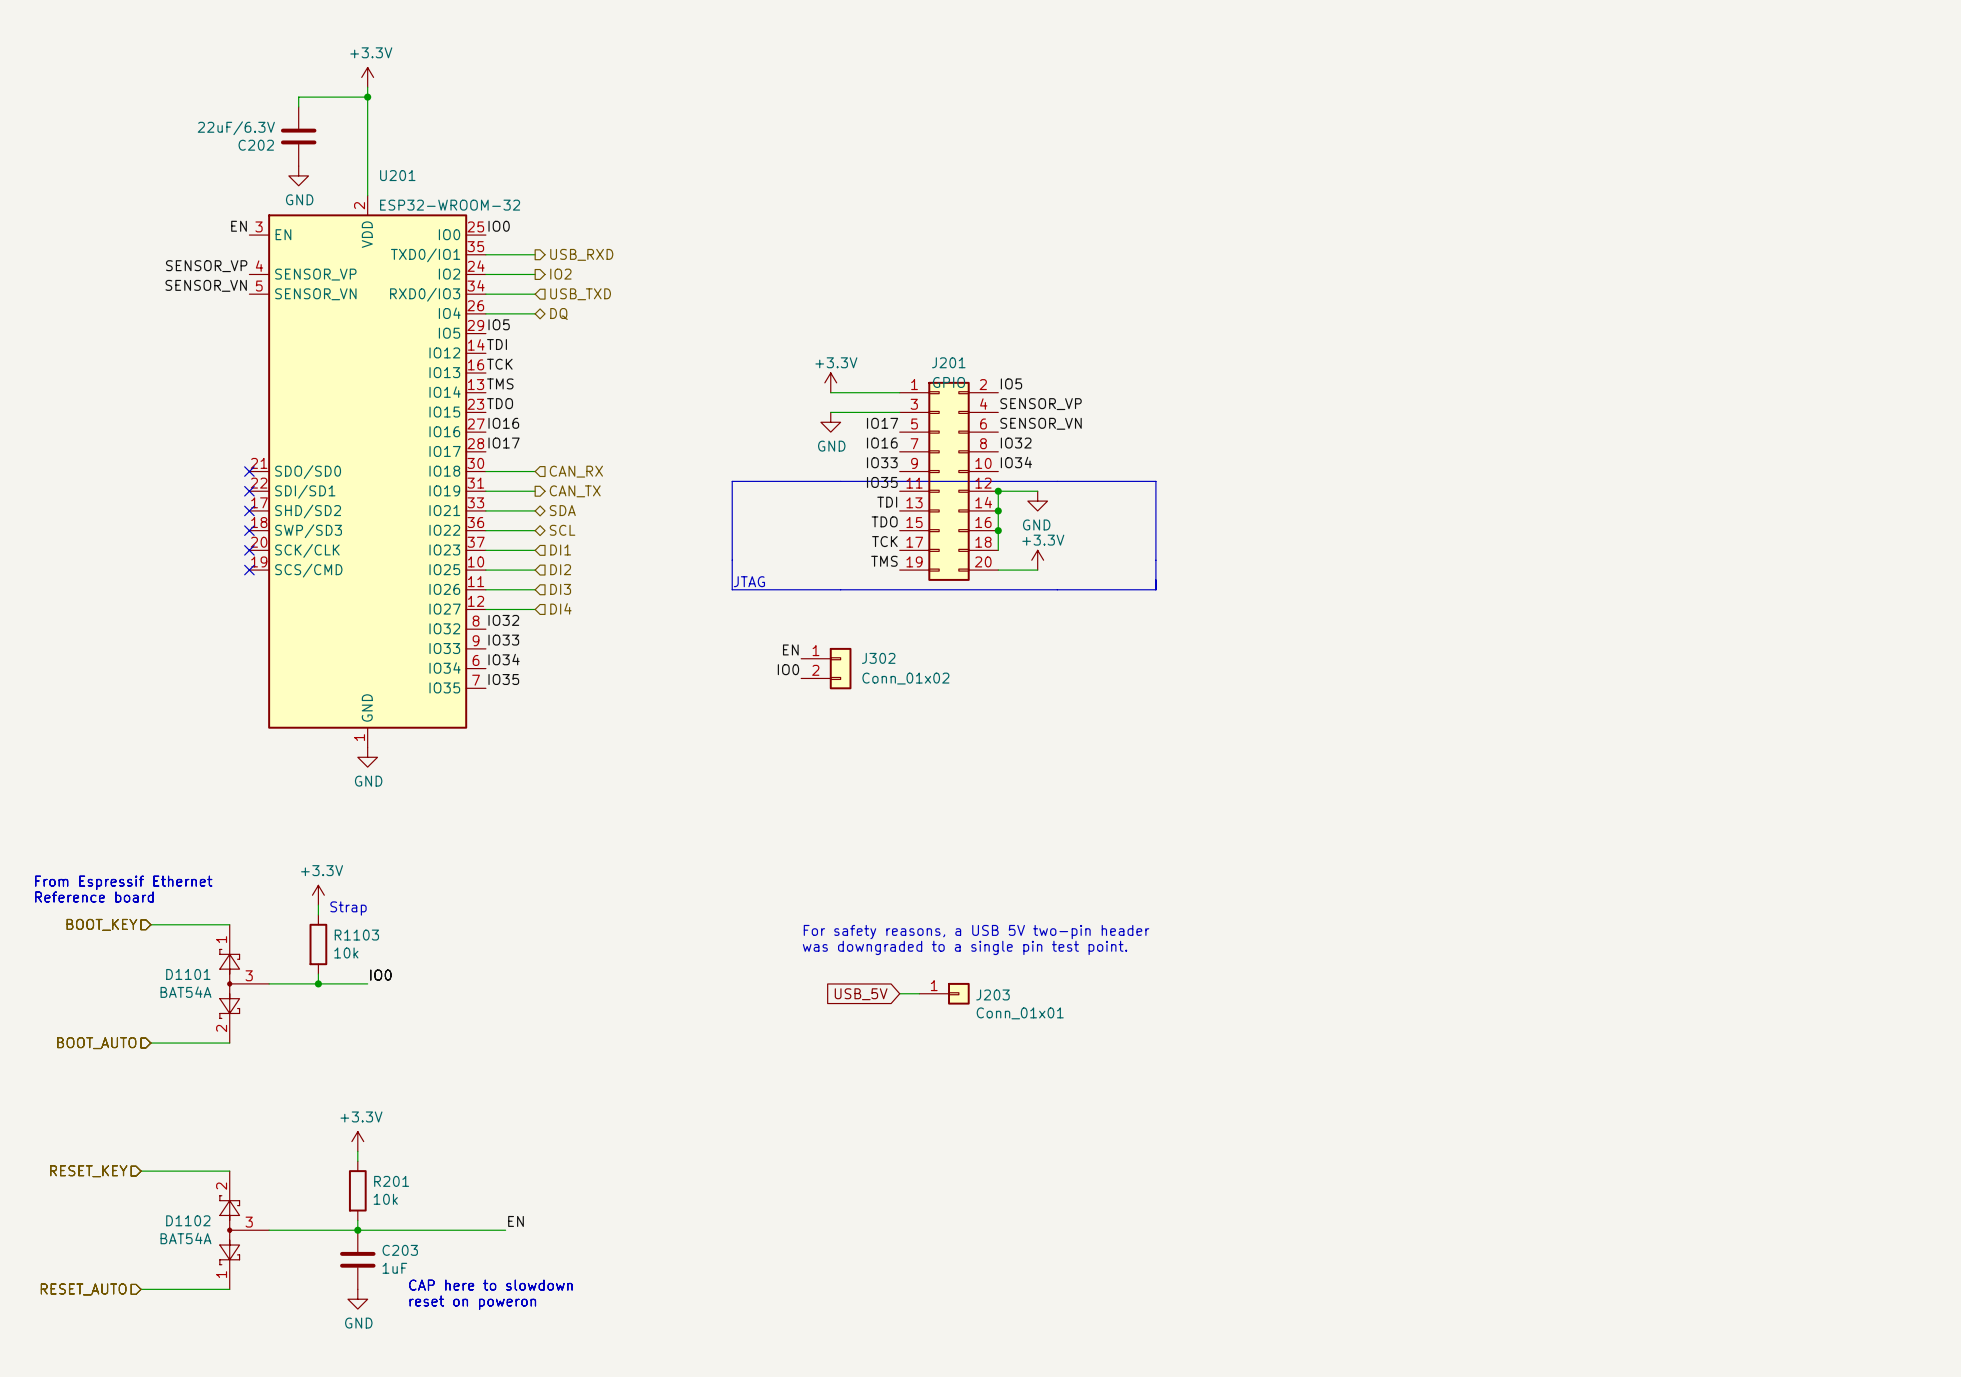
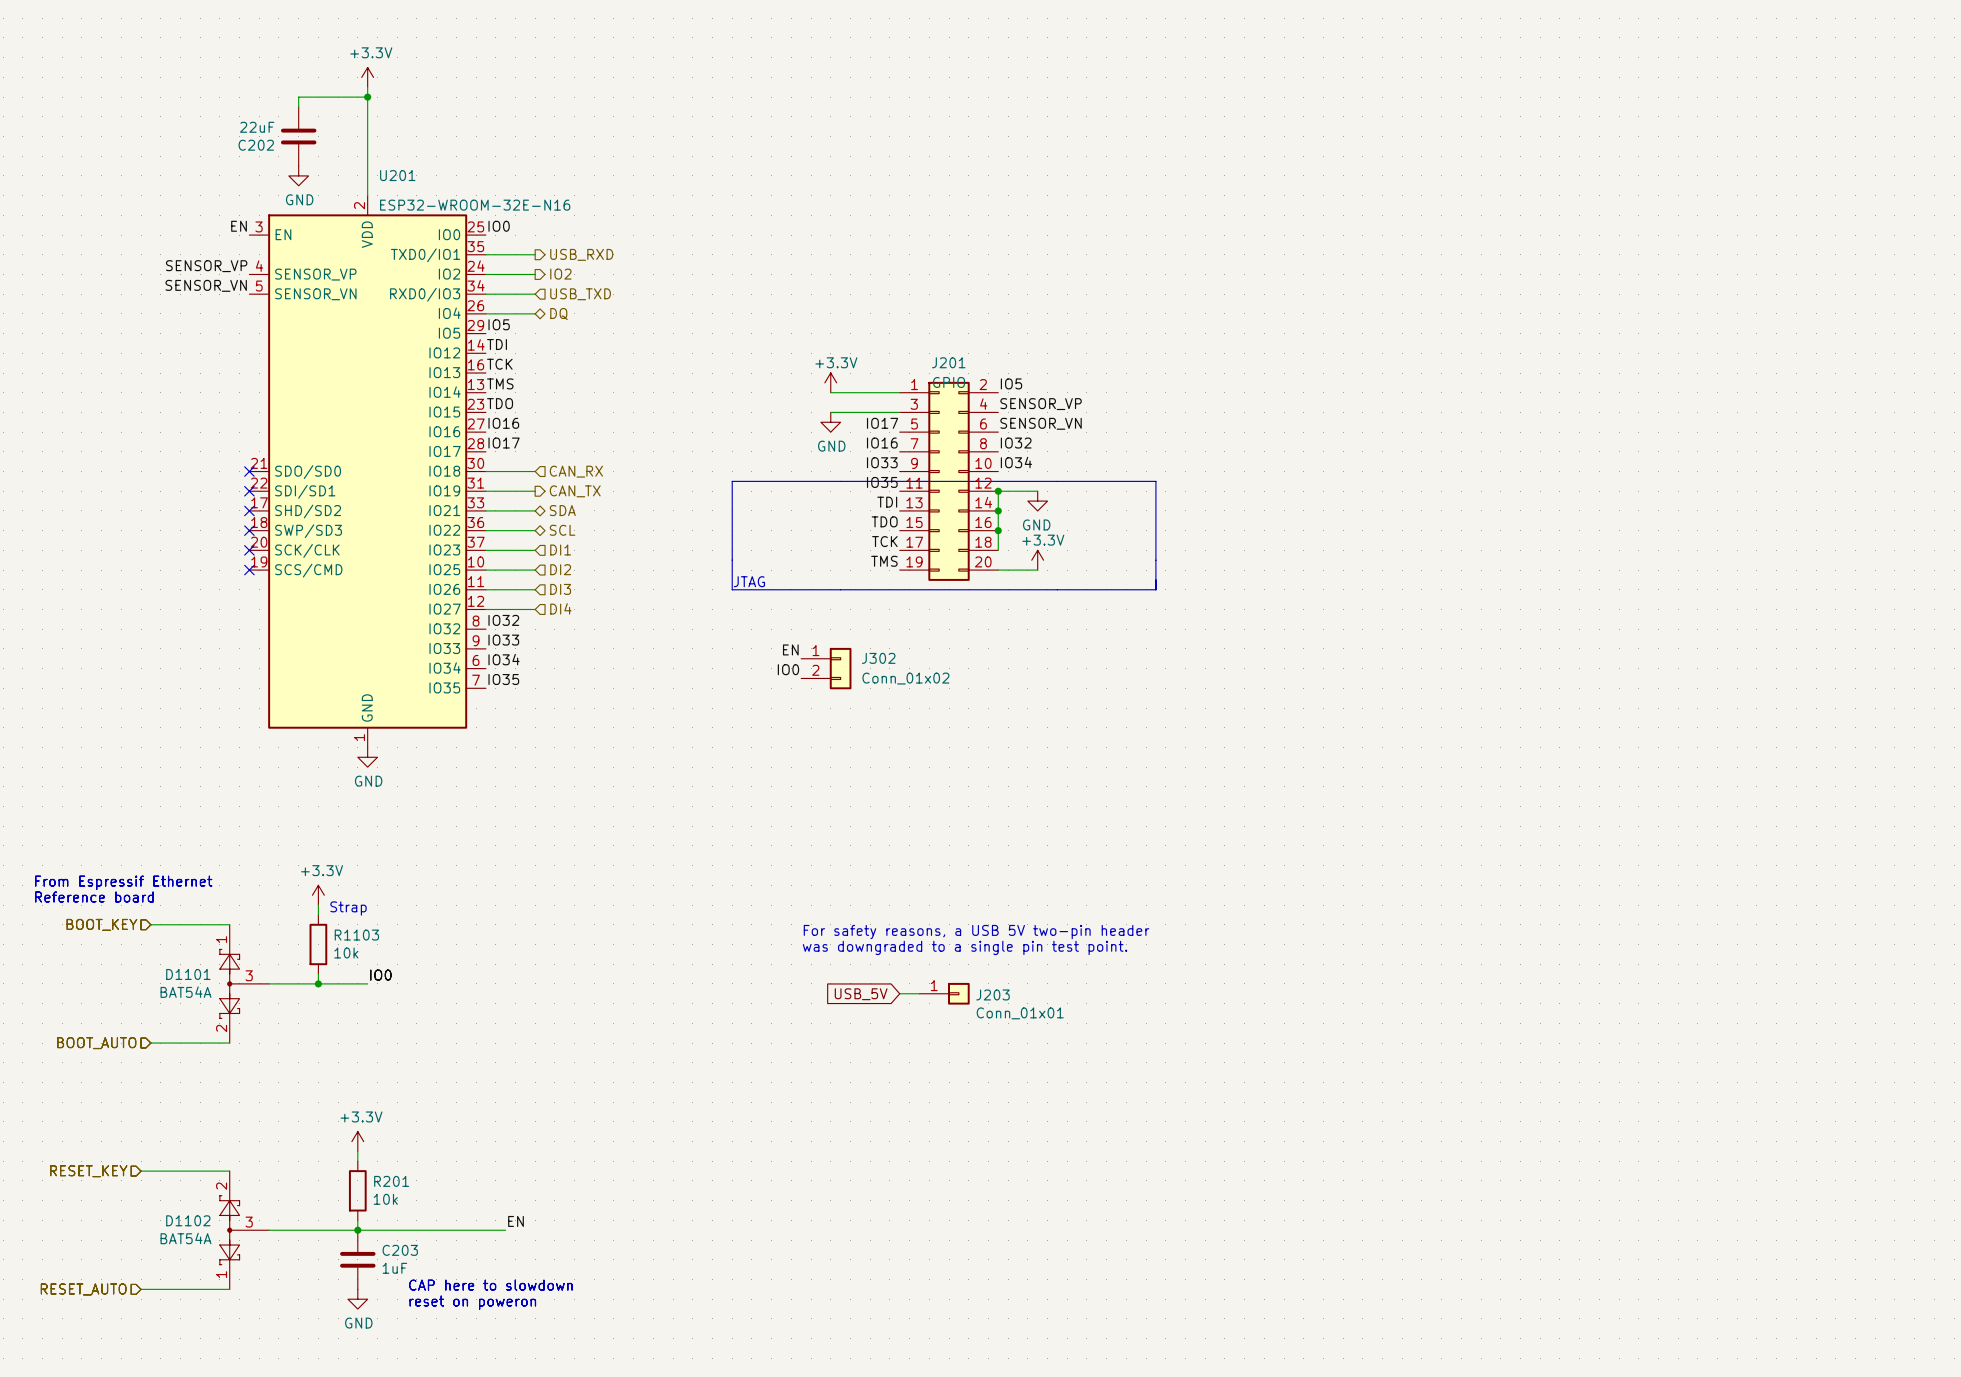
C202 value: 22uF/6.3V (236, 128) -> 22uF (257, 127)
U201 value: ESP32-WROOM-32 (450, 205) -> ESP32-WROOM-32E-N16 (475, 205)

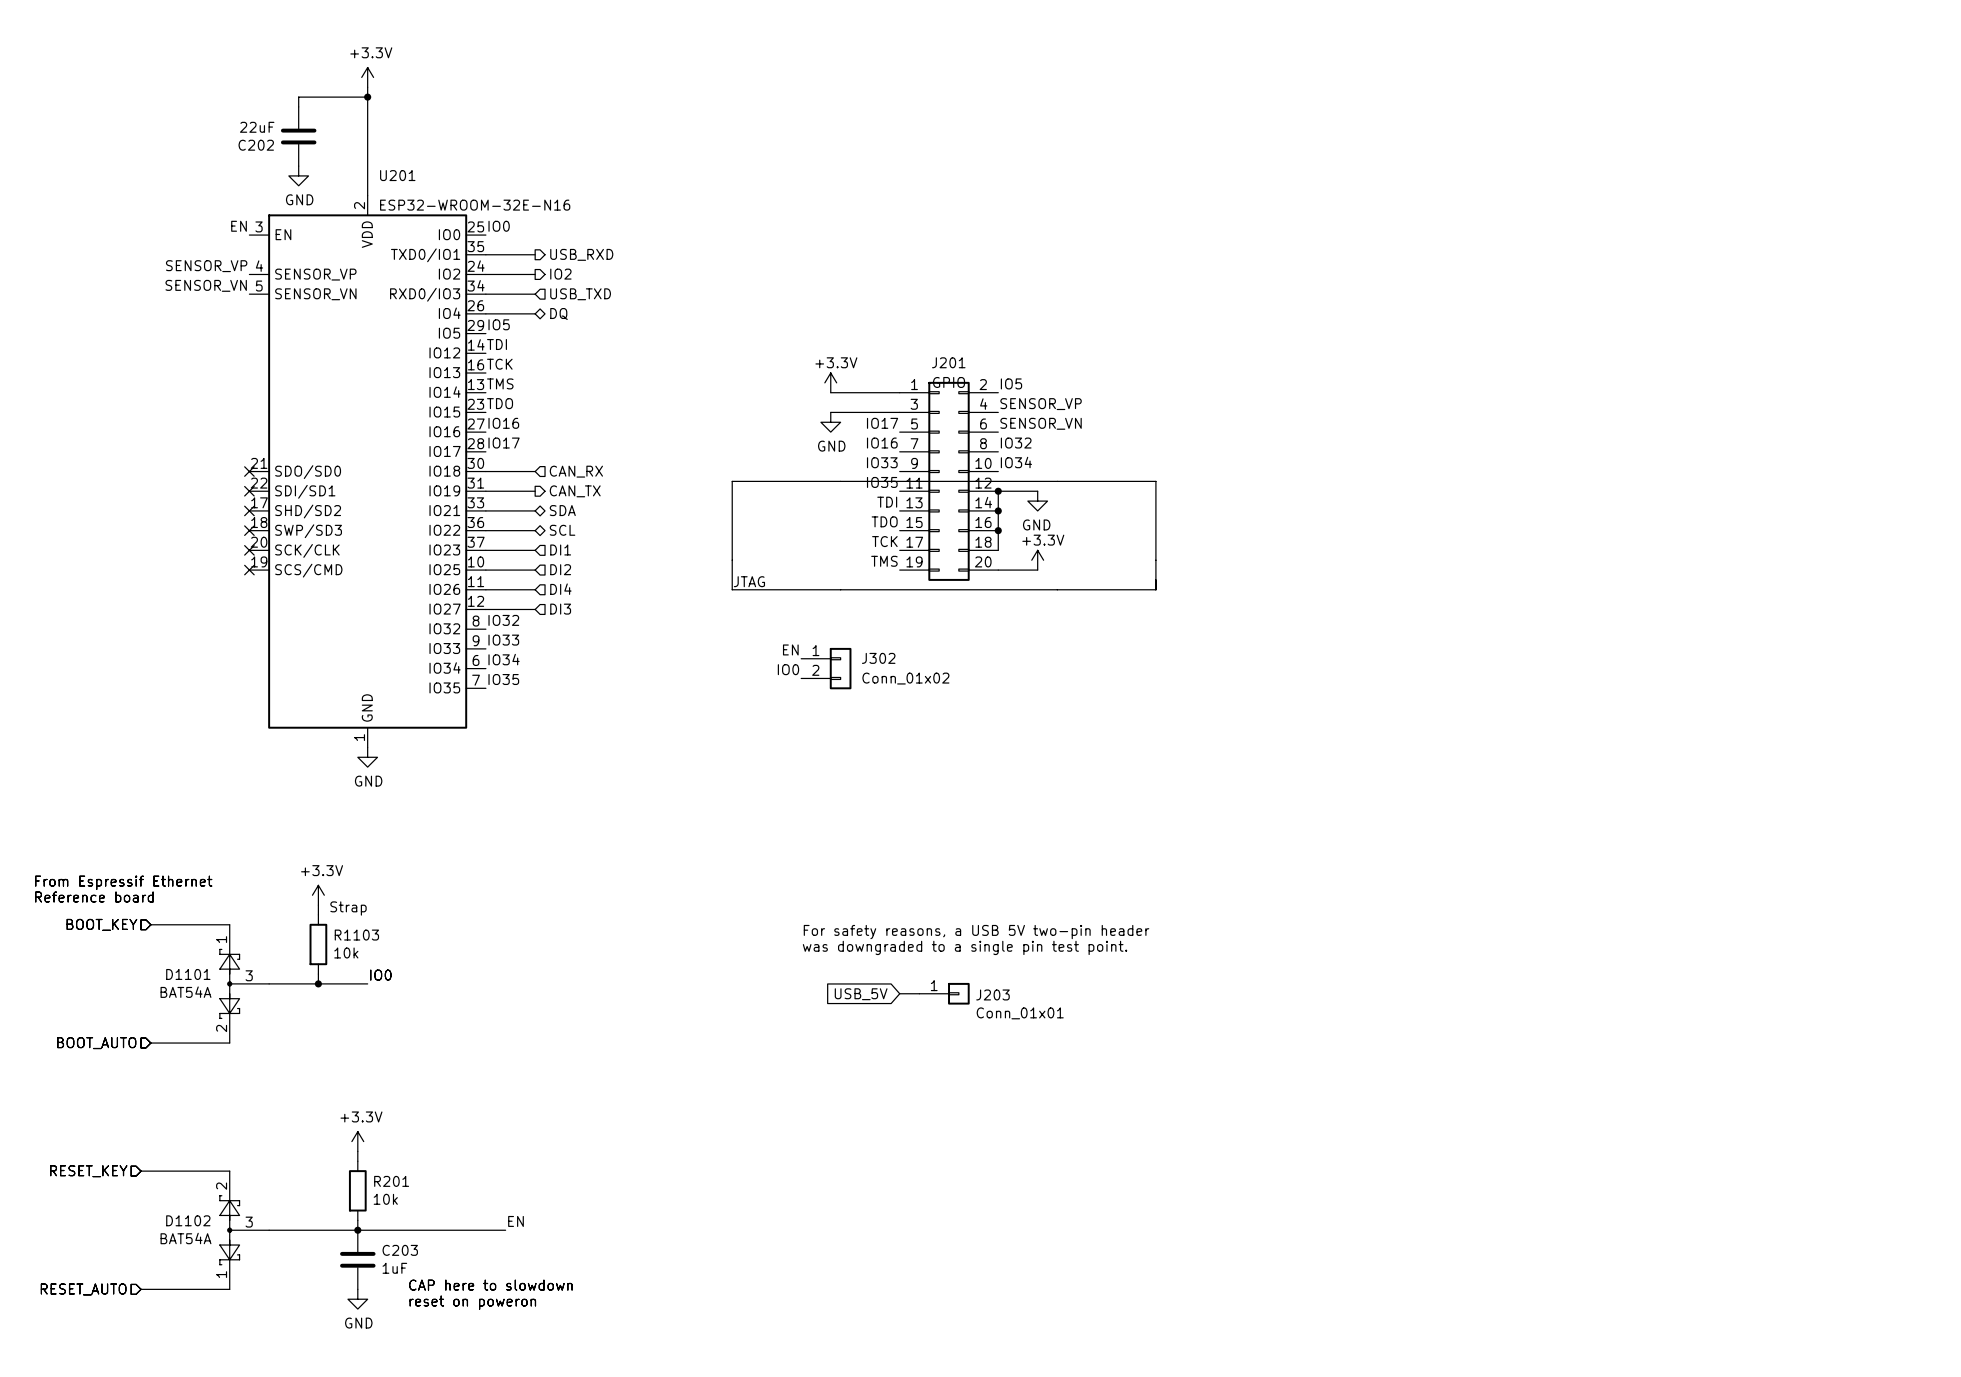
hierarchical label: DI3 (560, 589) -> DI4 (560, 589)
hierarchical label: DI4 (560, 608) -> DI3 (560, 609)

